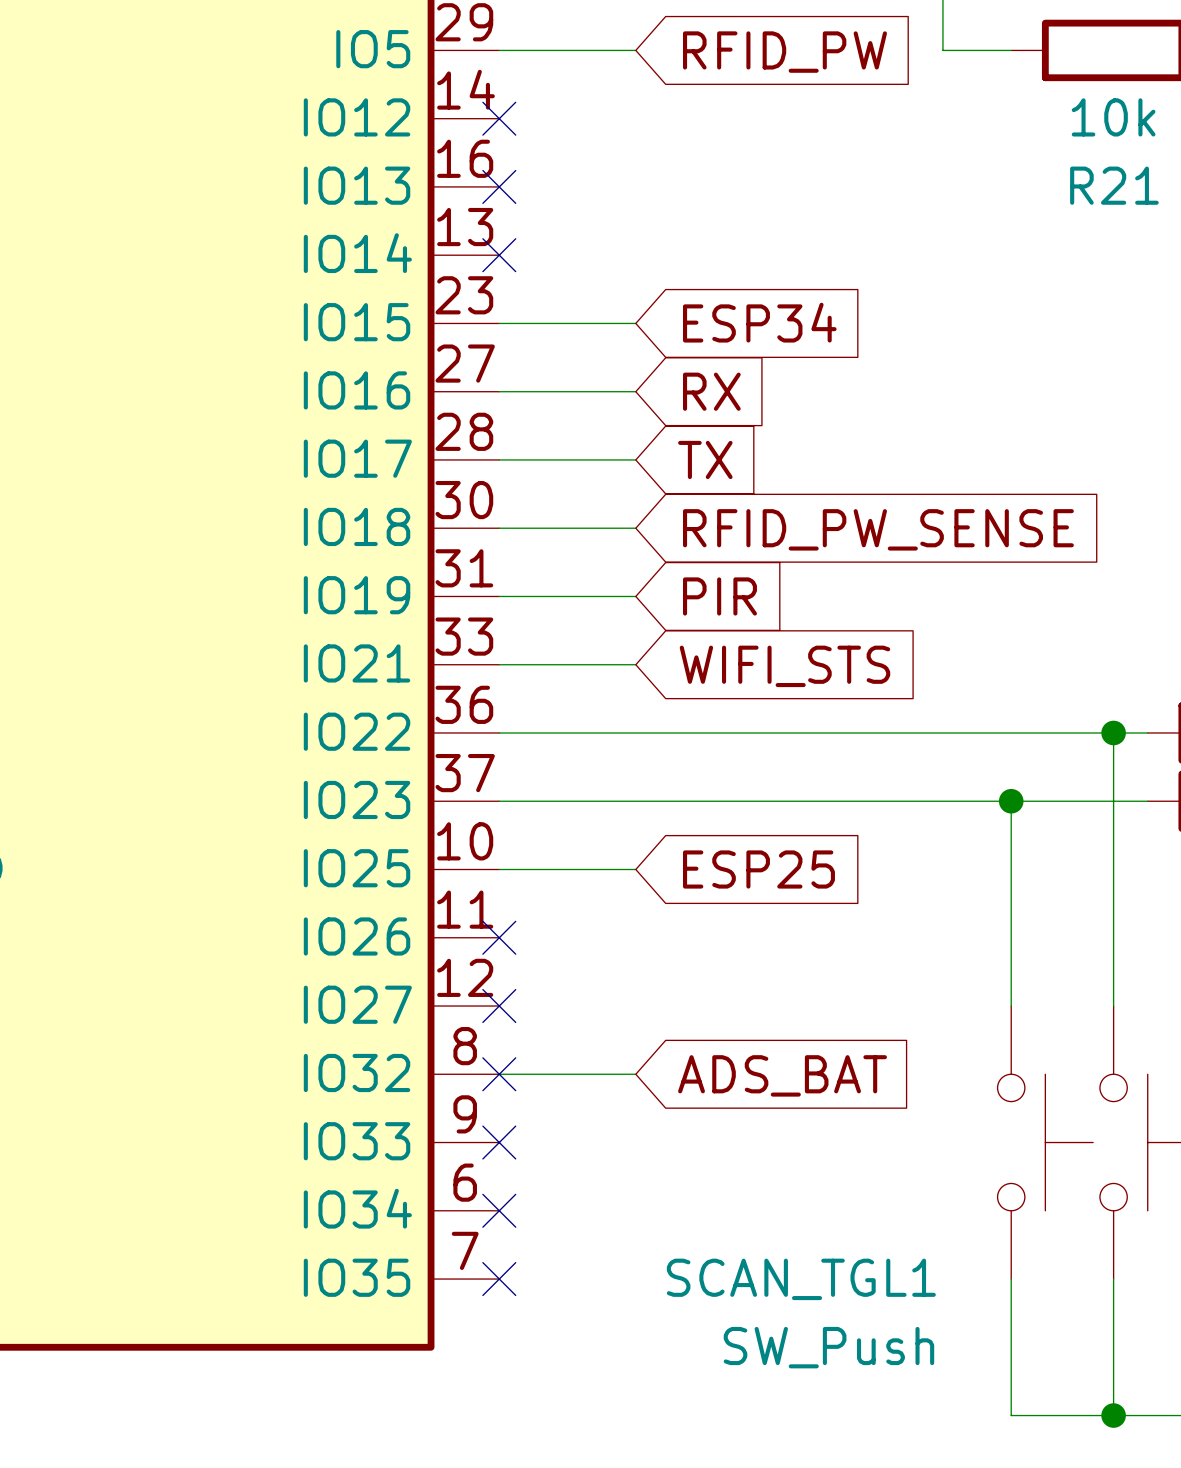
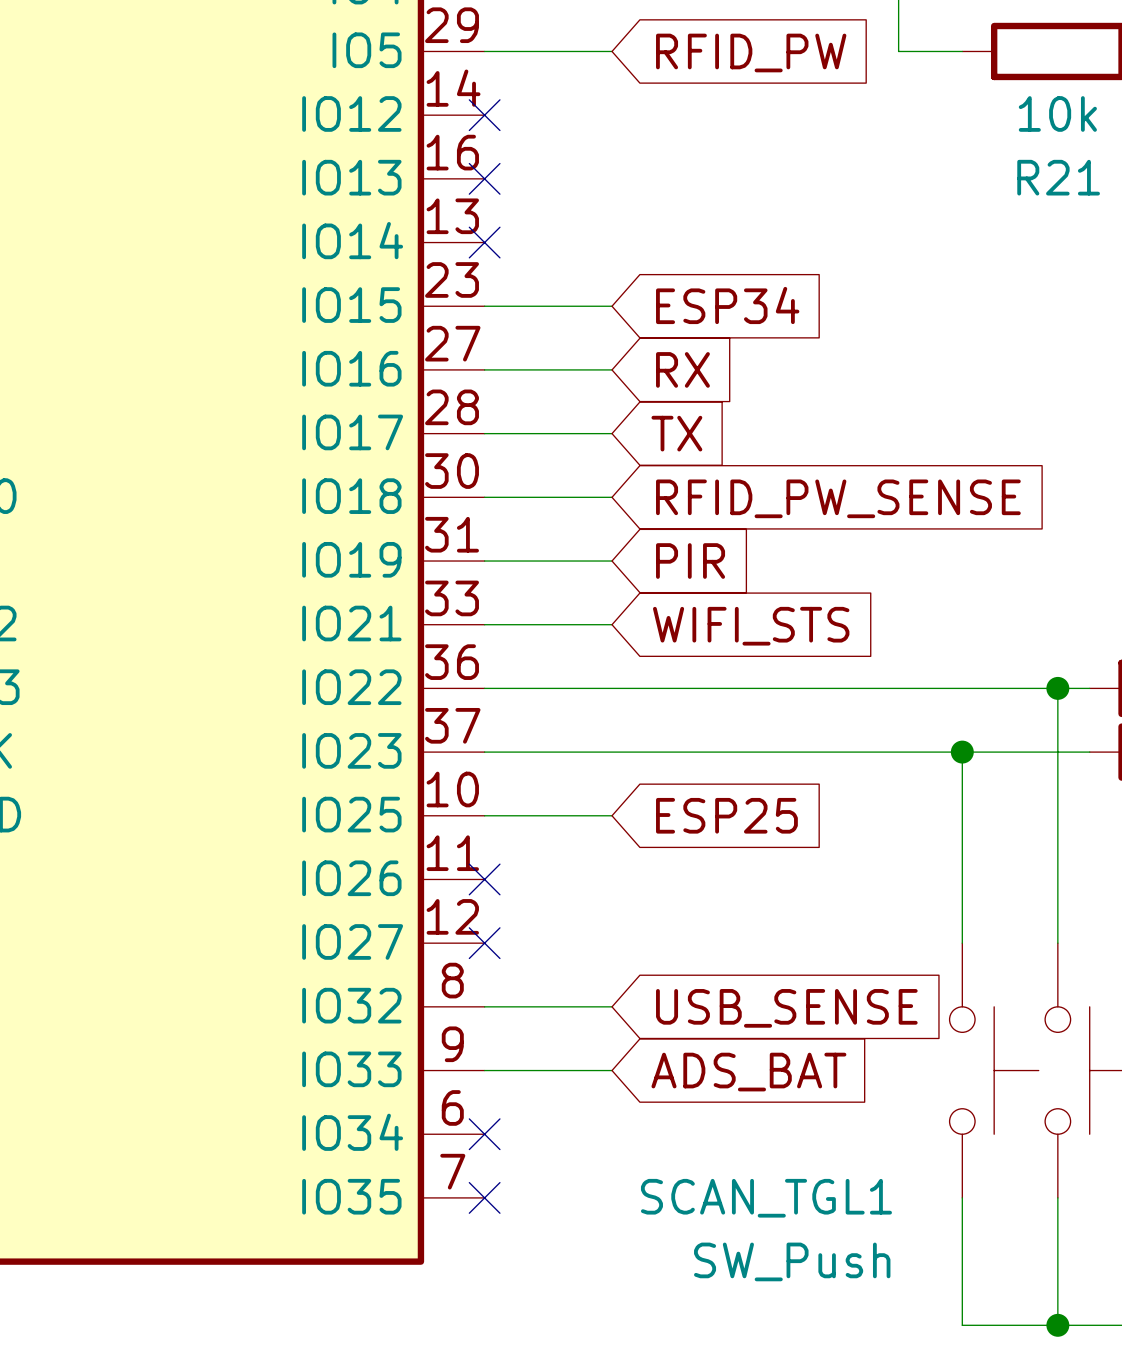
no-connect mark: (499, 1074) -> none
global label: ADS_BAT (782, 1075) -> USB_SENSE (786, 1008)
wire: none -> (484, 1070) (612, 1070)
no-connect mark: (499, 1142) -> none
global label: none -> ADS_BAT (748, 1072)

